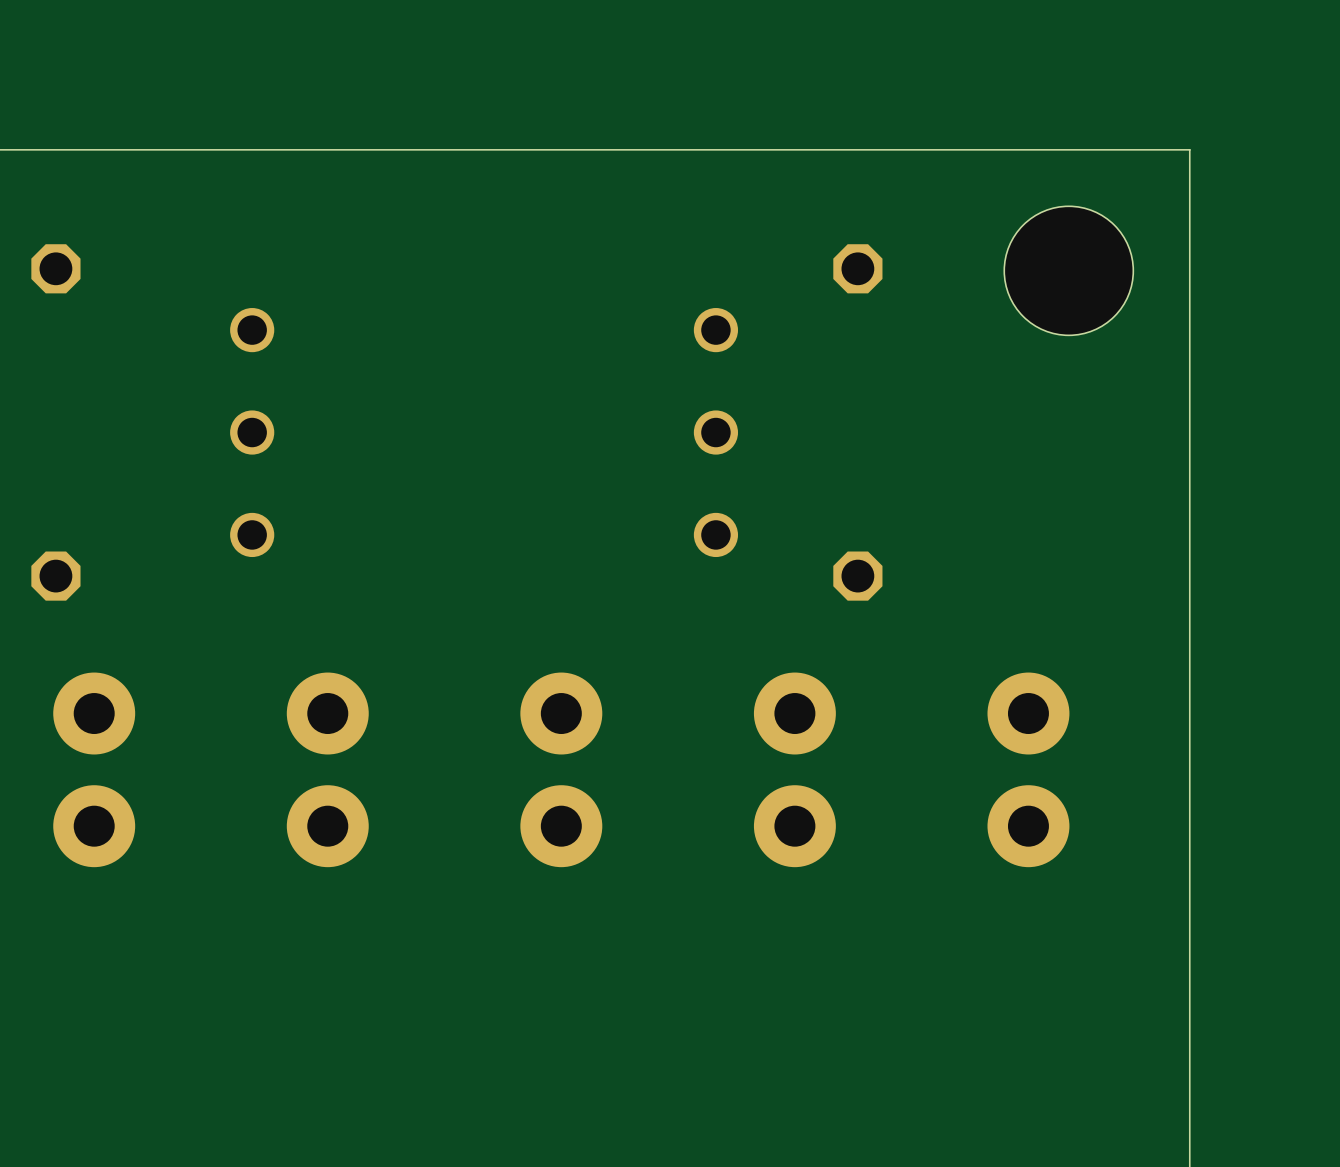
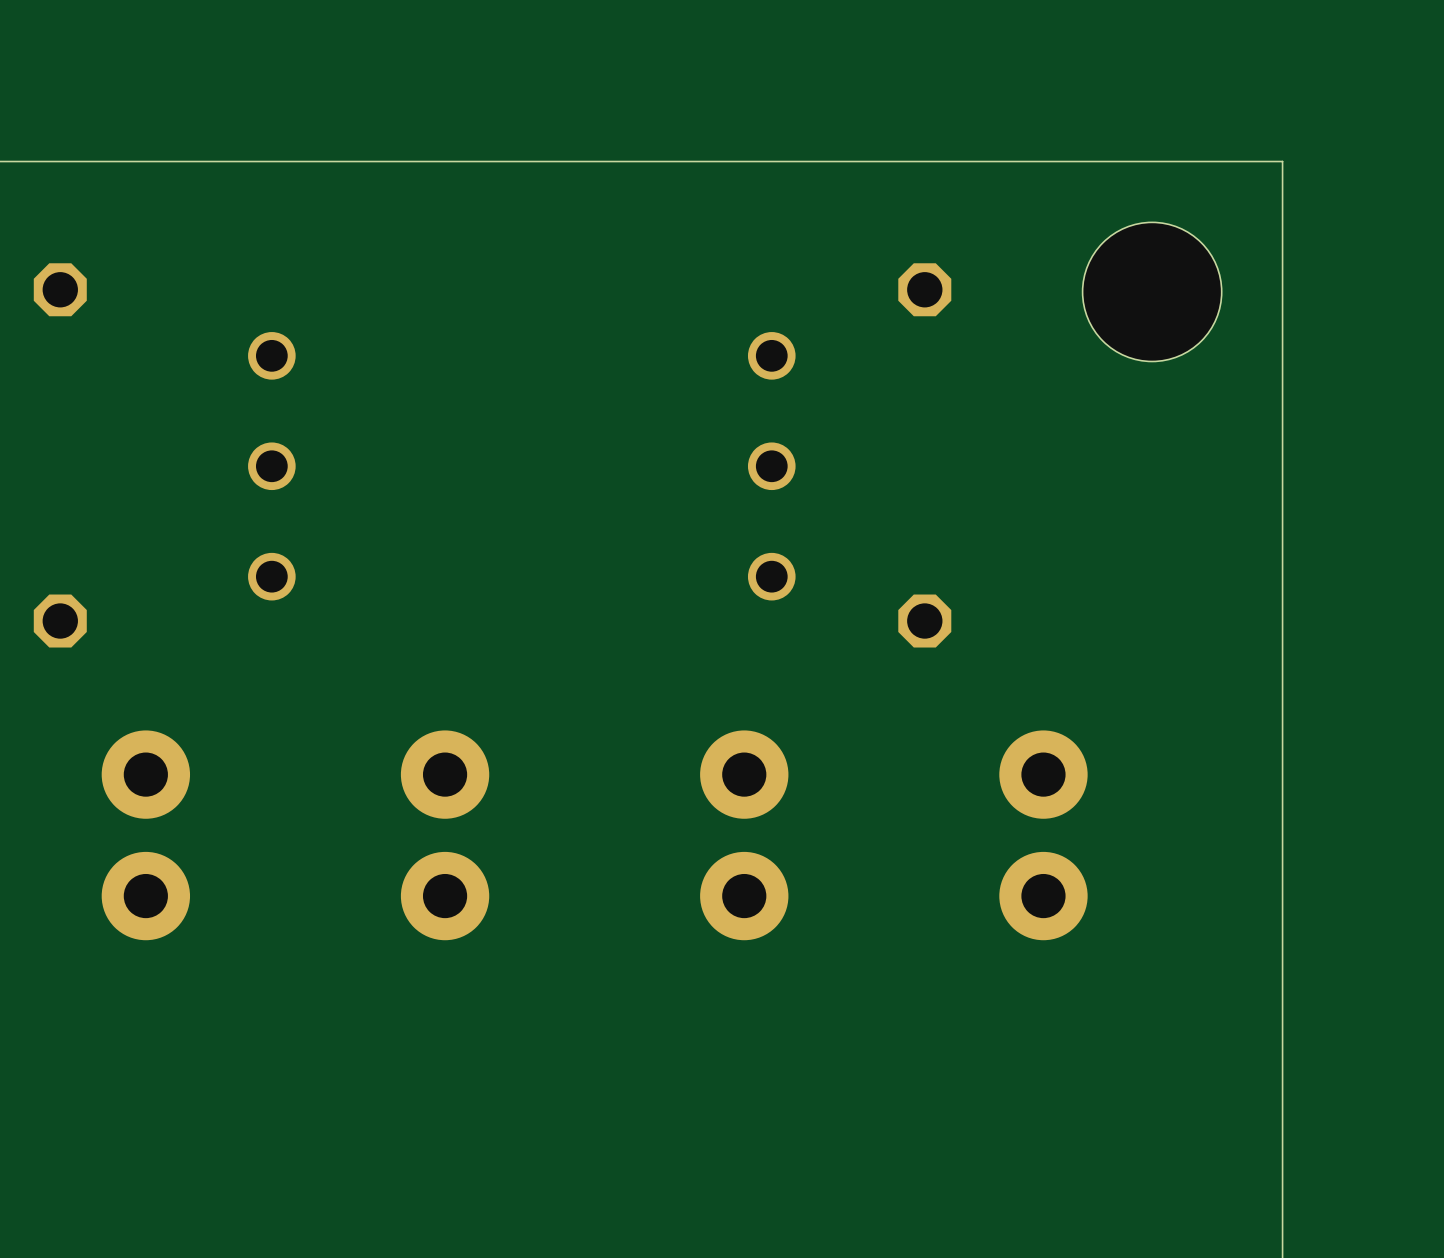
part position: (94, 769) -> (145, 835)
part: (327, 769) -> none
part: (561, 769) -> none
part: (794, 769) -> none
part position: (1028, 769) -> (1043, 835)
part: none -> (445, 835)
part: none -> (744, 835)

